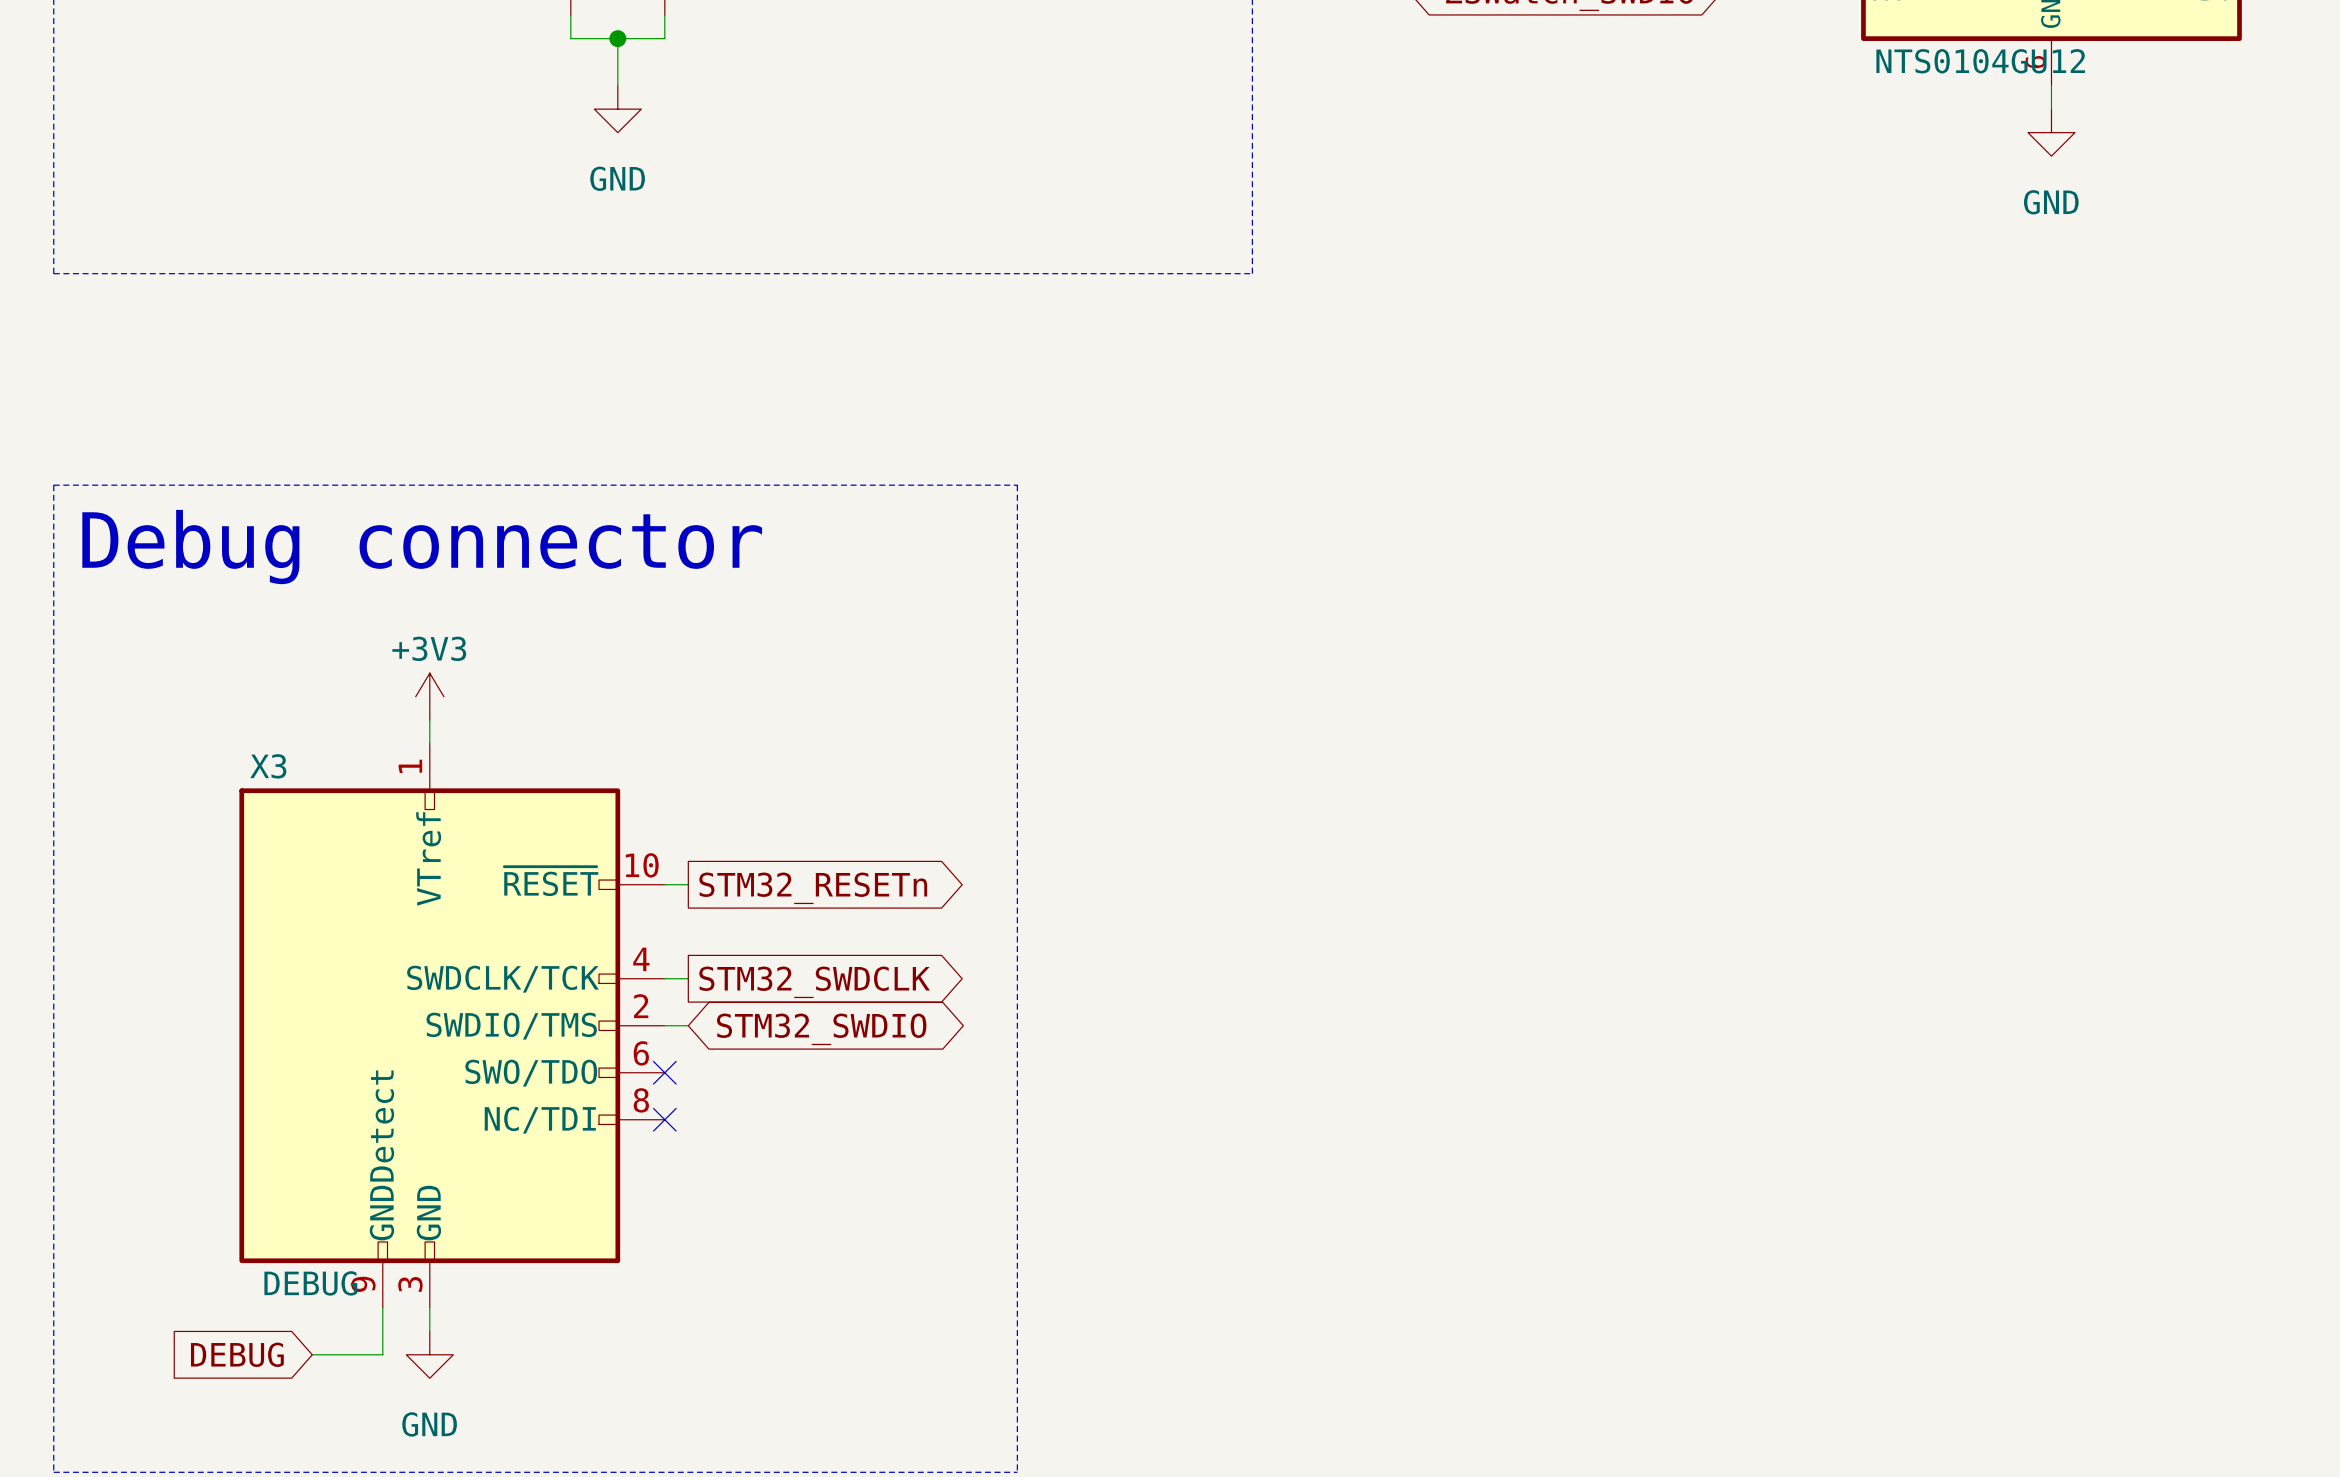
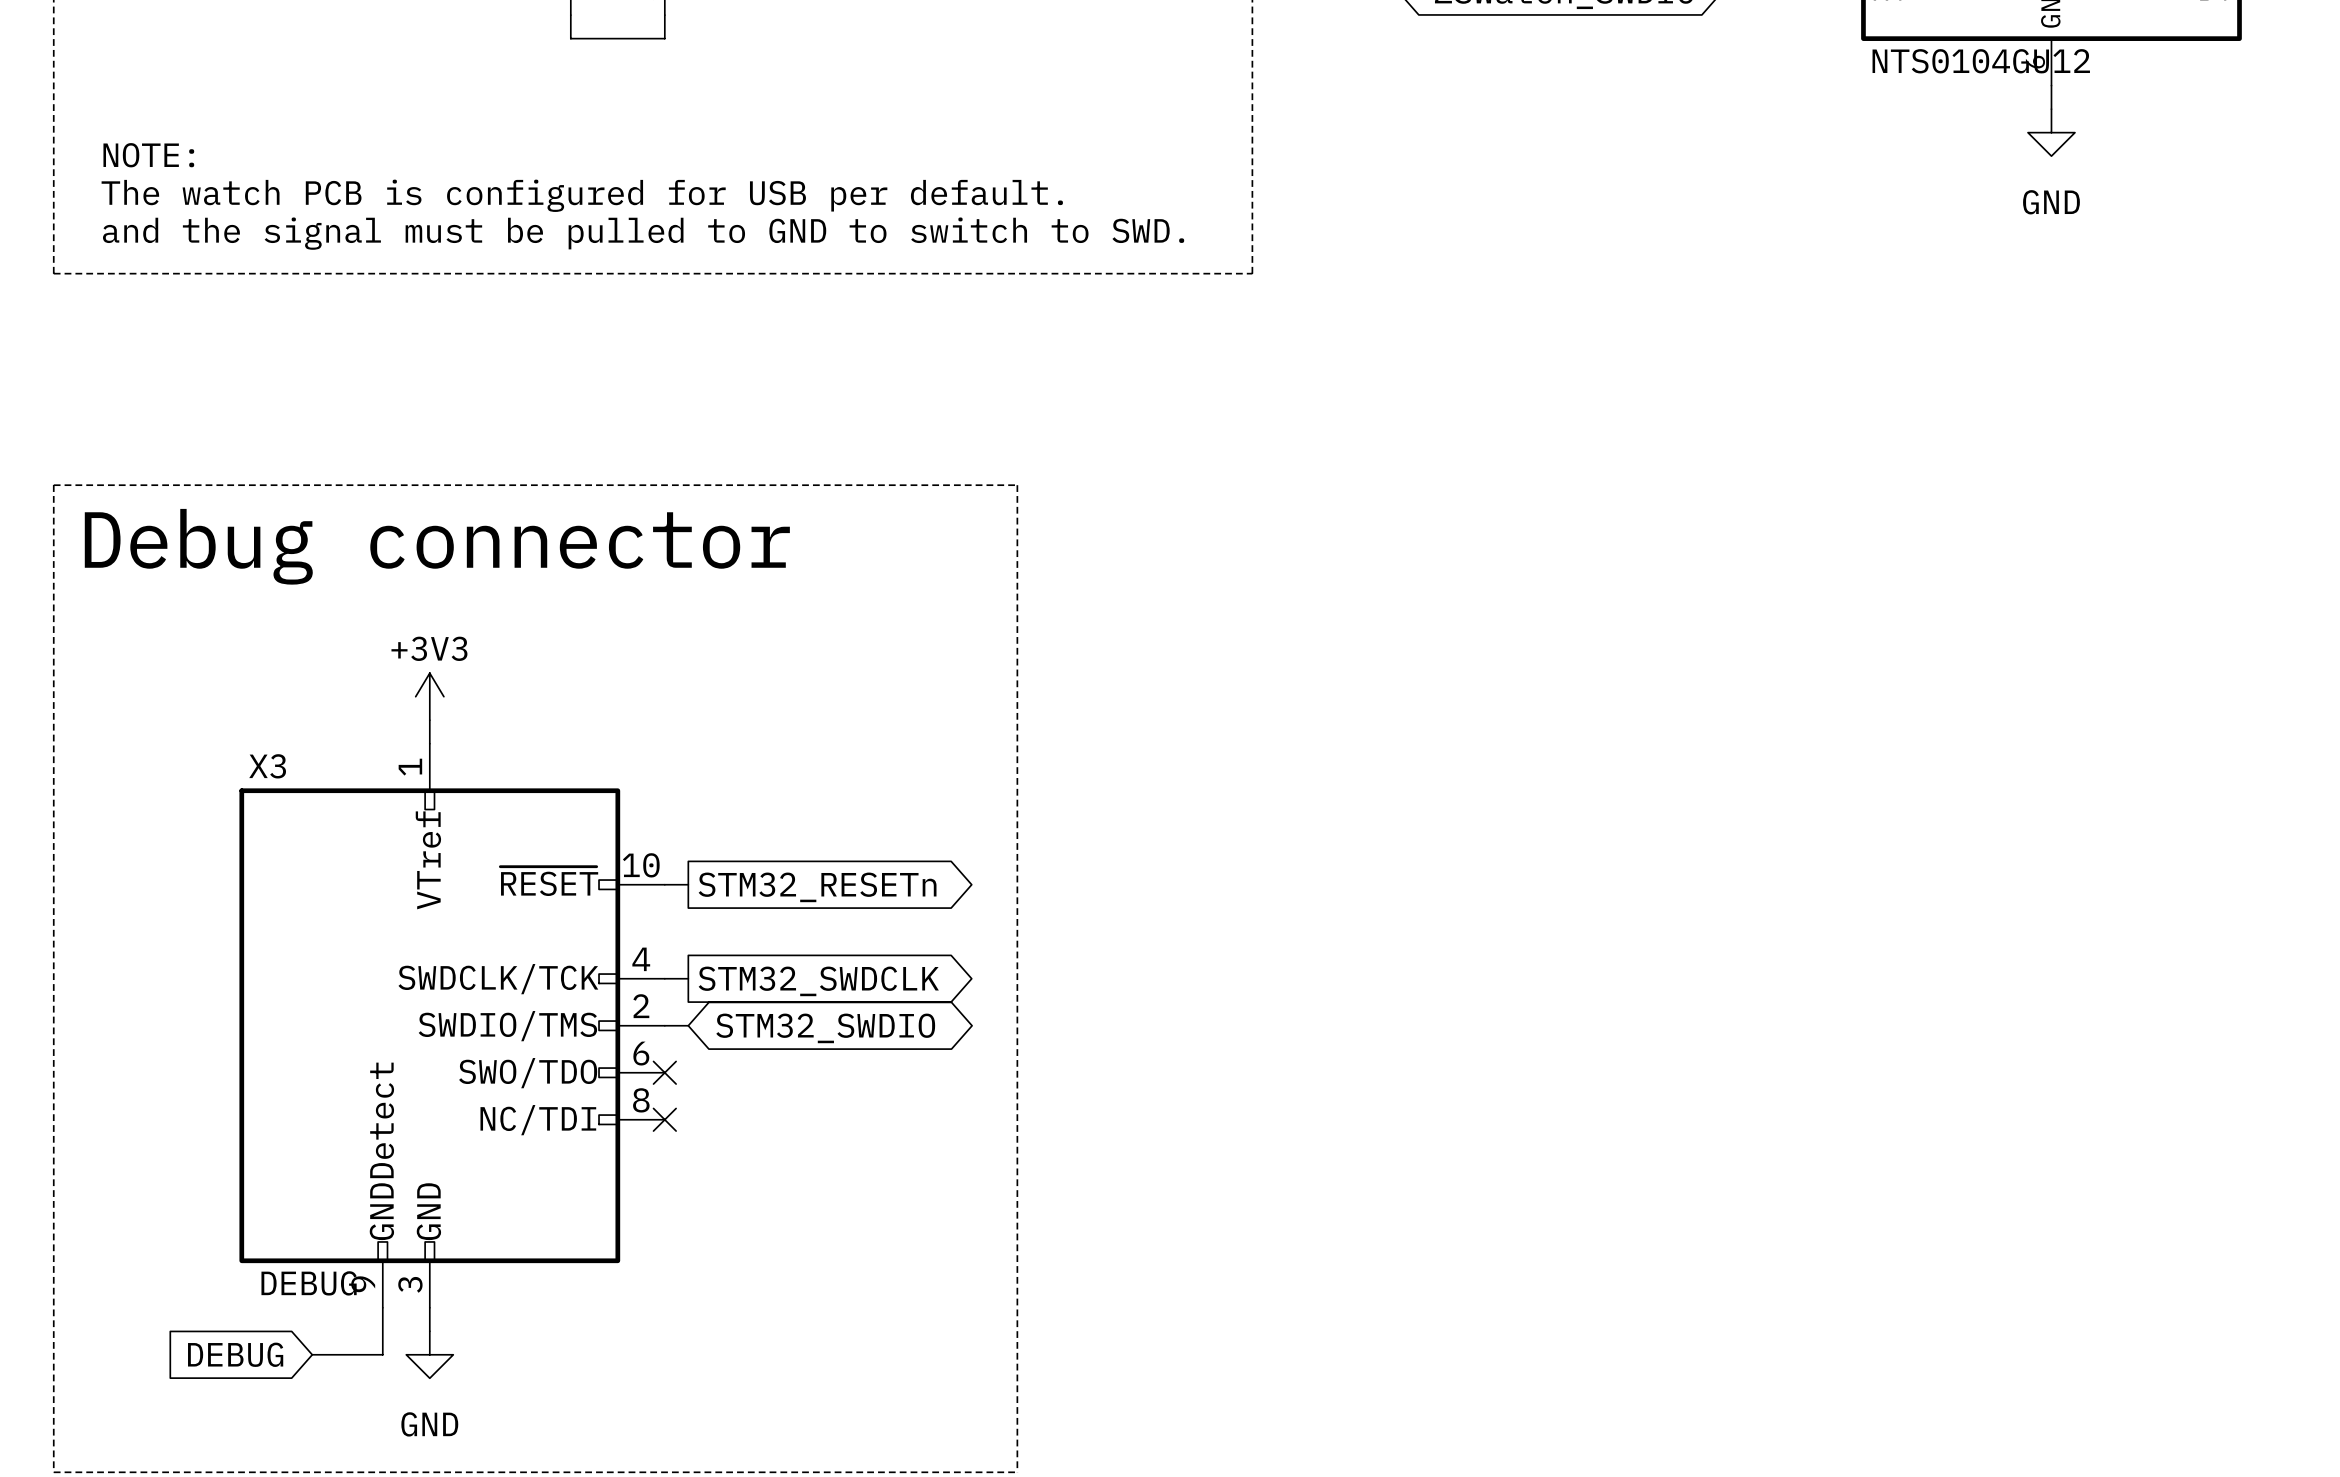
wire: (617, 38) (617, 85) -> none
junction: (617, 38) -> none
power symbol: GND (617, 109) -> none
text: none -> NOTE: (148, 155)
text: none -> The watch PCB is configured for USB per default. (582, 195)
text: none -> and the signal must be pulled to GND to switch to SWD. (643, 233)

